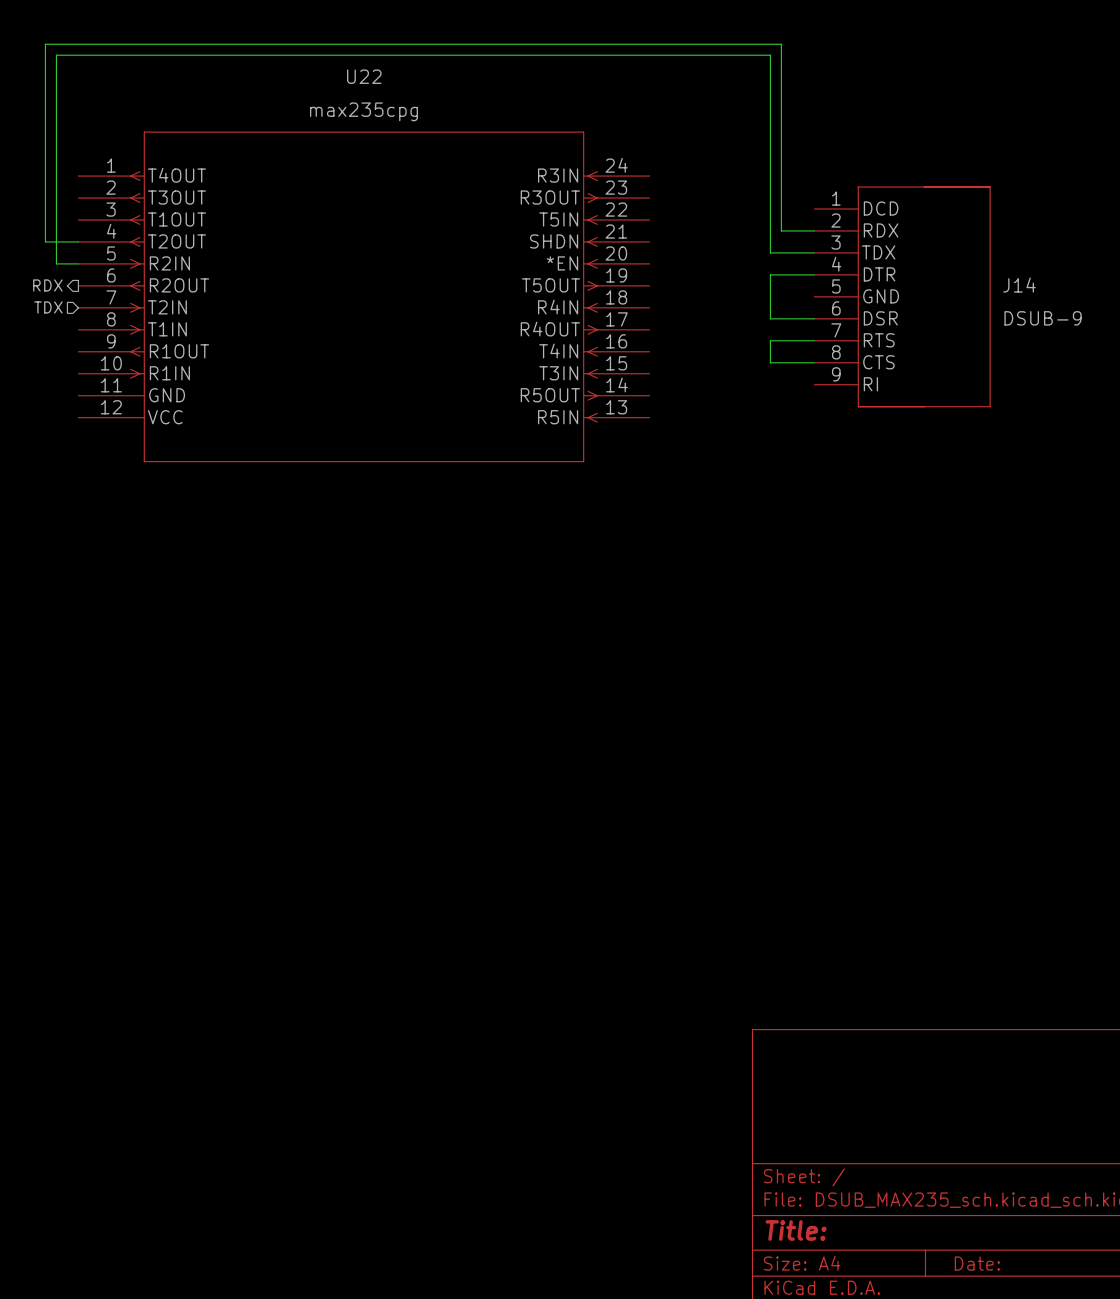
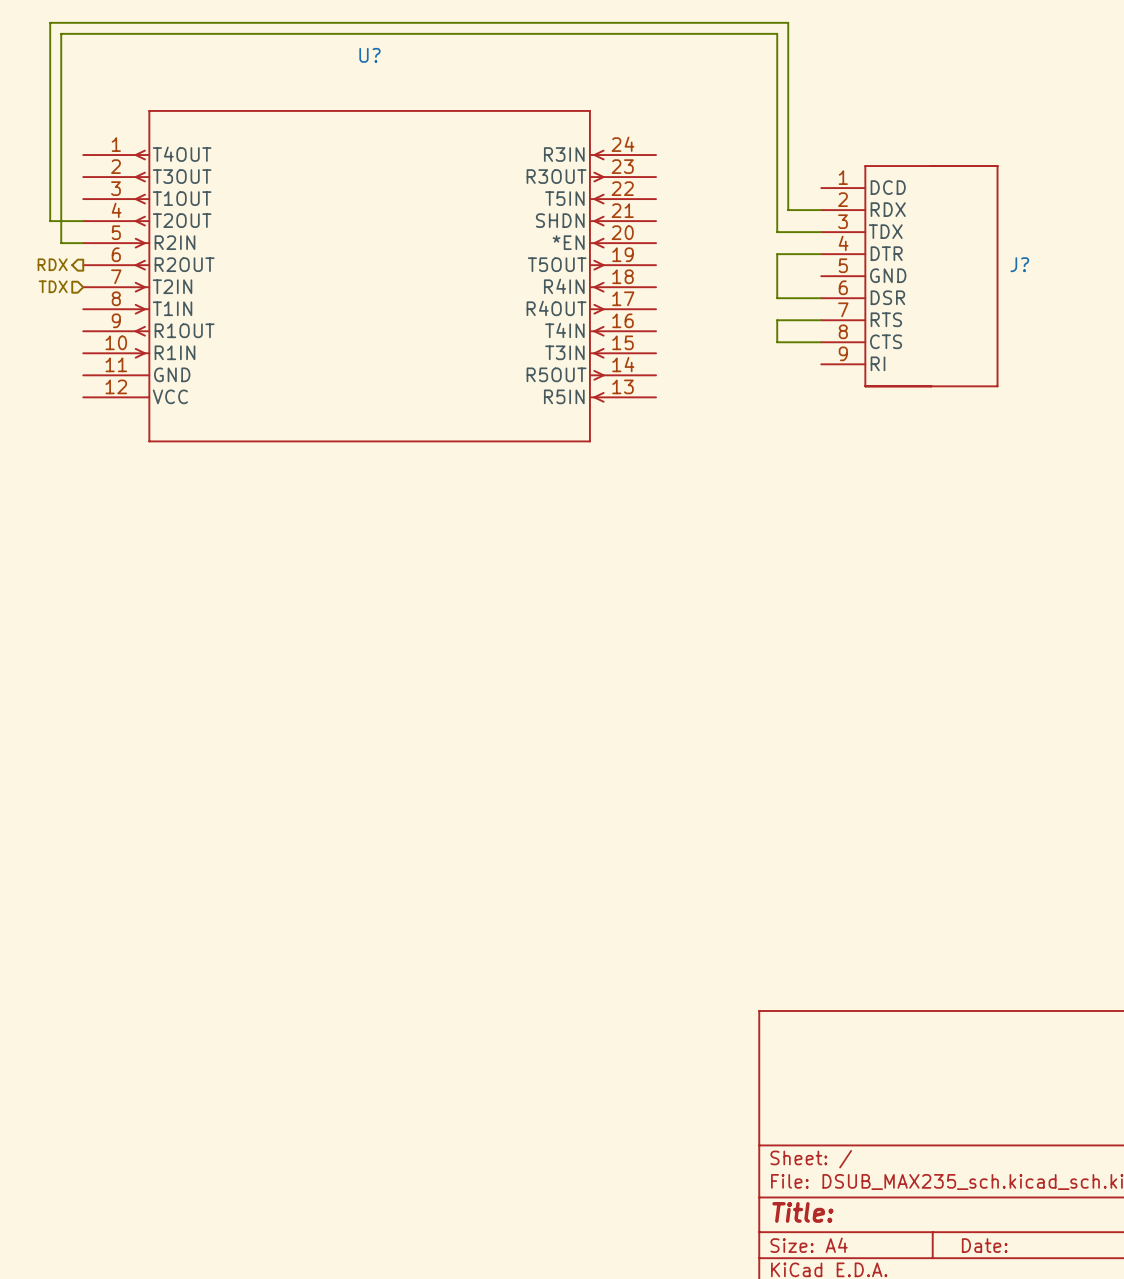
U22 name: U22 (364, 76) -> U? (369, 55)
U22 value: max235cpg (363, 111) -> none
J14 name: J14 (1019, 285) -> J? (1019, 264)
J14 value: DSUB-9 (1043, 318) -> none

